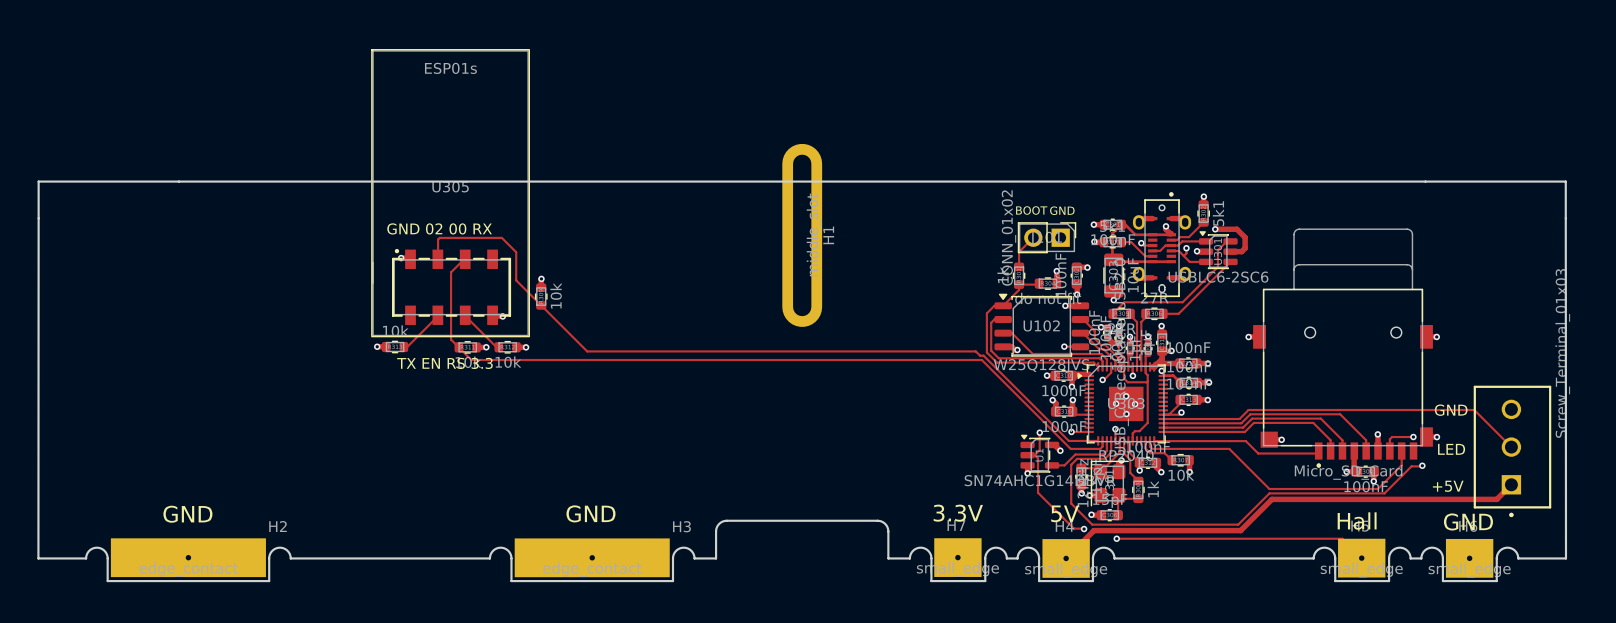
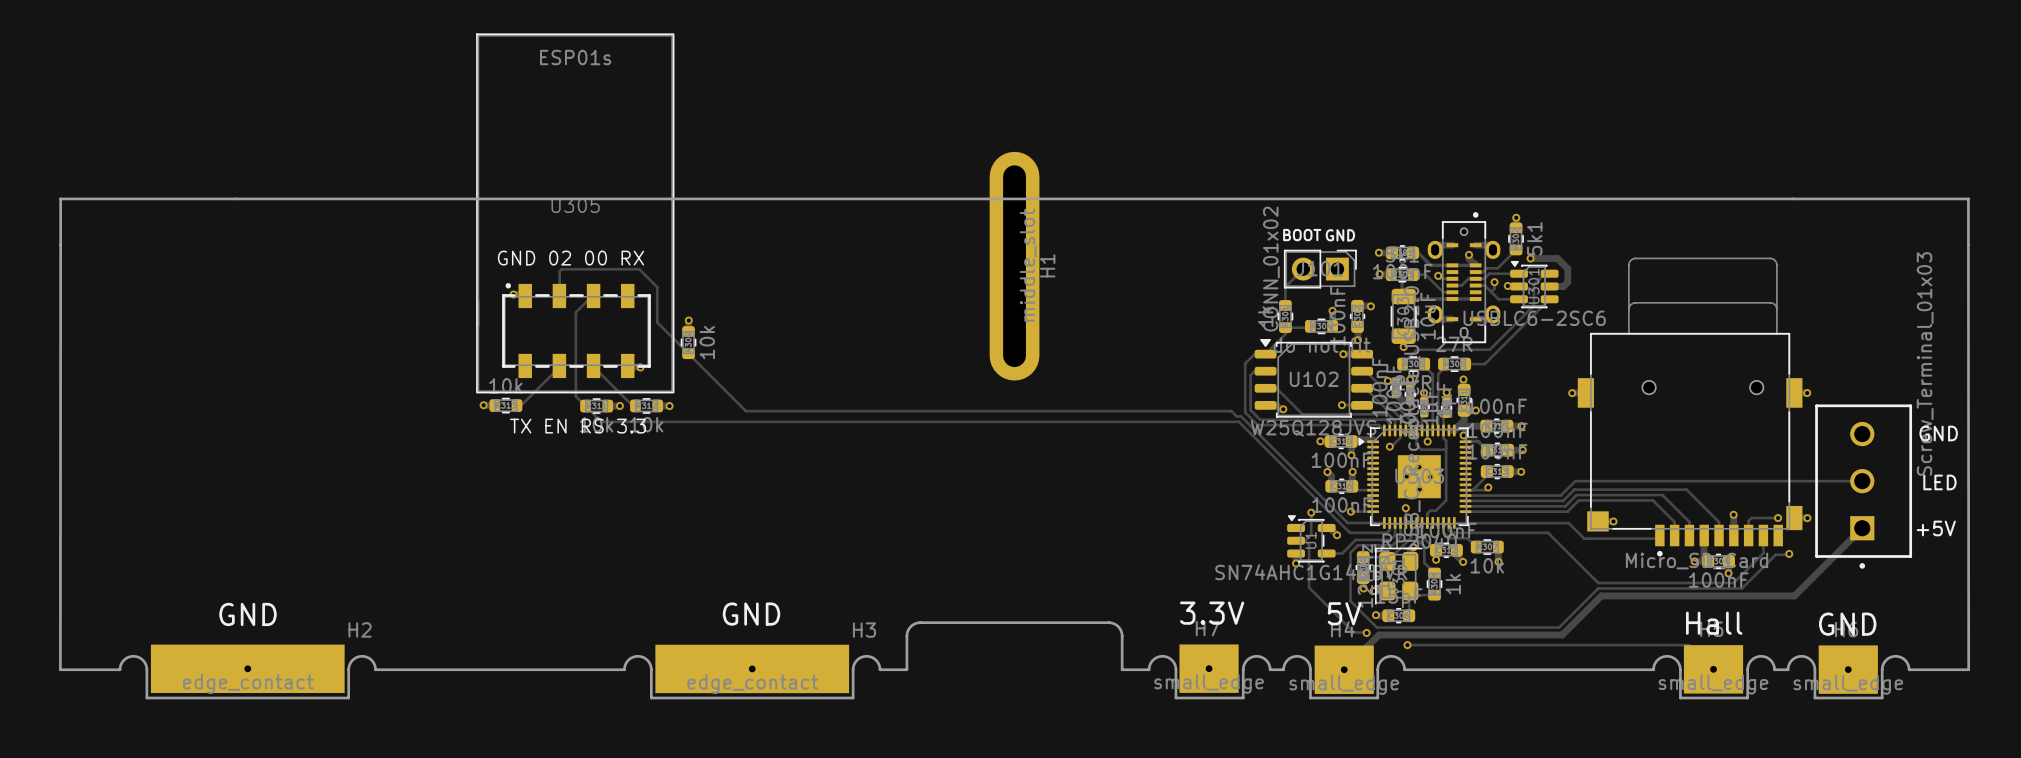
track: (1248, 409) (1474, 409) (1511, 447) -> (1572, 484) (1575, 481) (1862, 481)
text position: GND (1451, 410) -> GND (1938, 433)
text position: LED (1451, 449) -> LED (1939, 482)
part position: (1512, 451) -> (1863, 486)
track: (1511, 484) (1496, 499) (1426, 499) -> (1862, 528) (1794, 595)
text position: +5V (1448, 486) -> +5V (1936, 528)

